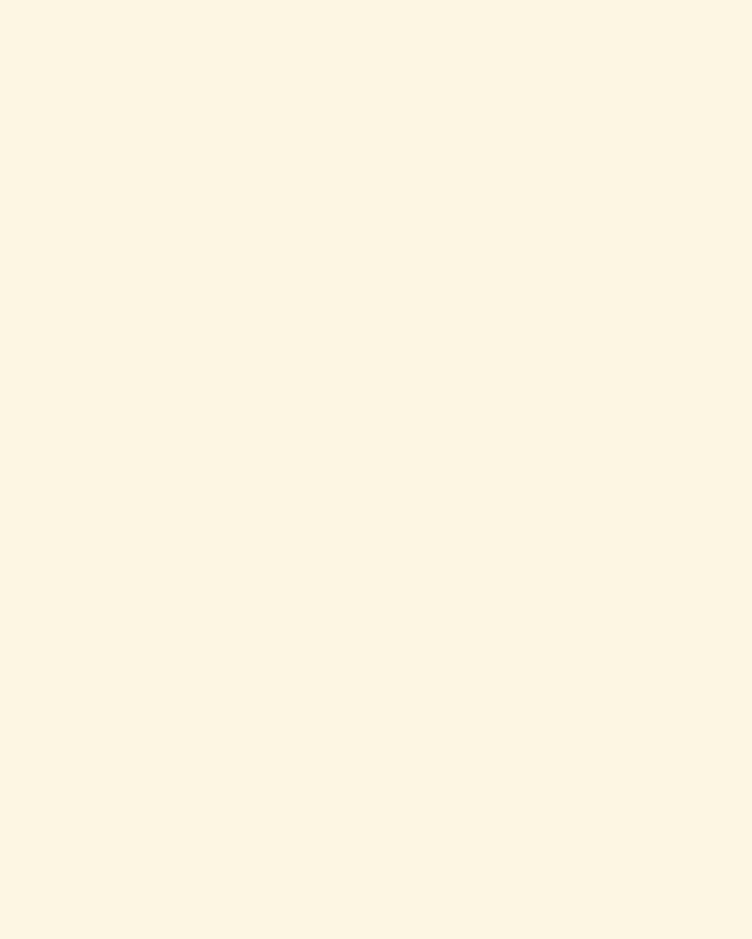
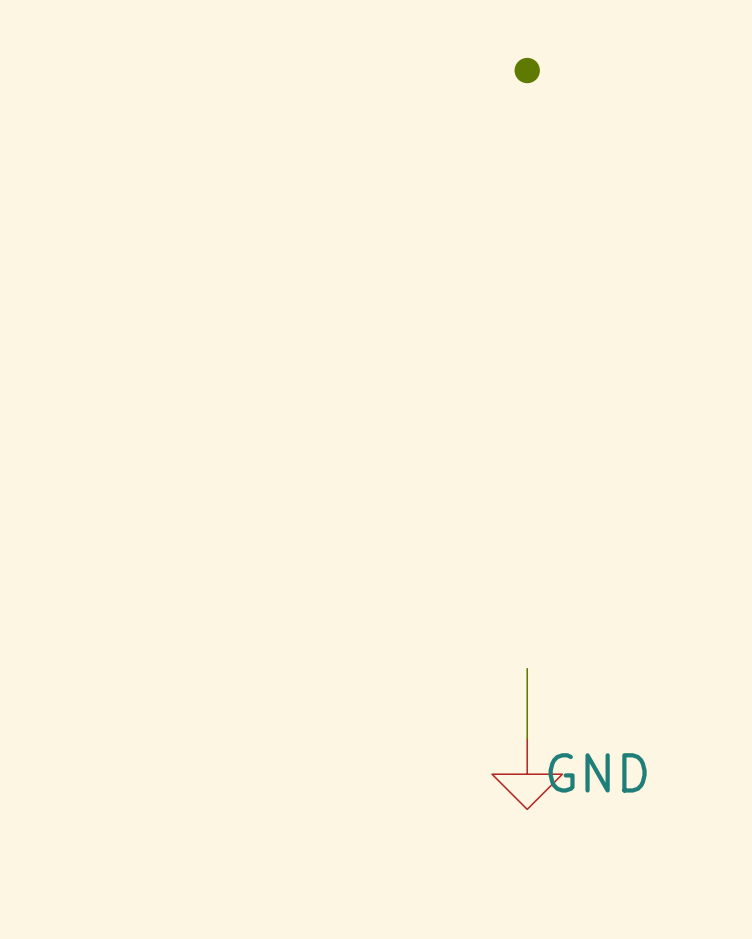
junction: none -> (527, 70)
wire: none -> (527, 668) (527, 739)
power symbol: none -> GND (527, 774)

